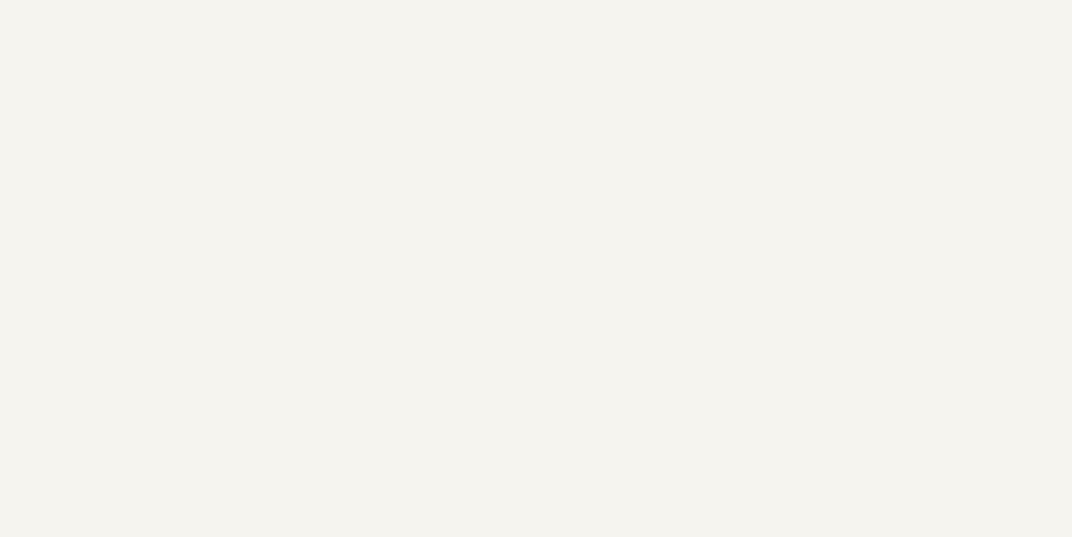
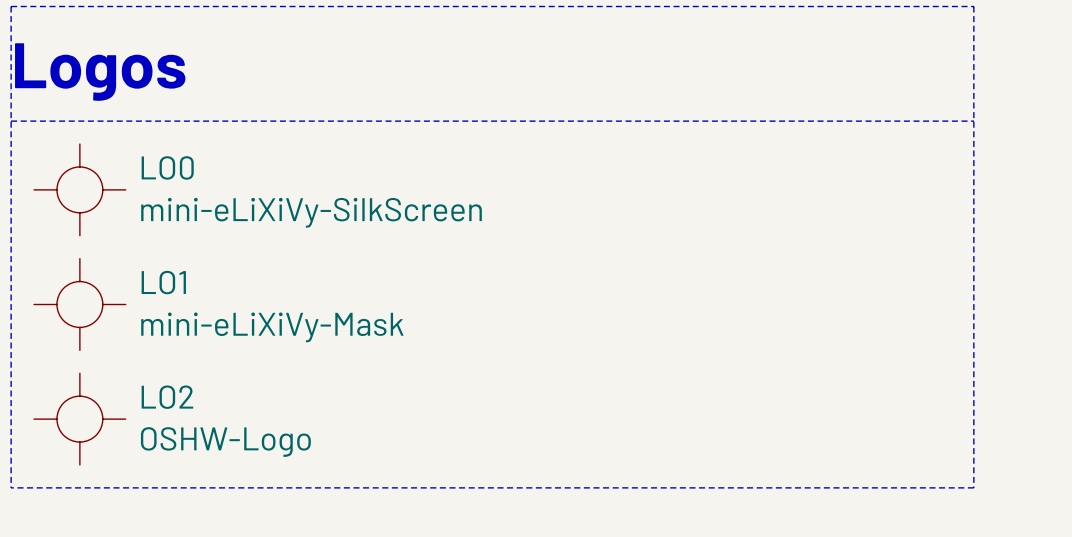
line: none -> (11, 6) (11, 487) (973, 487) (973, 6) (11, 6)
text: none -> Logos (100, 72)
line: none -> (11, 121) (973, 121)
LO0: none -> mini-eLiXiVy-SilkScreen (79, 189)
LO1: none -> mini-eLiXiVy-Mask (79, 304)
LO2: none -> OSHW-Logo (79, 419)

